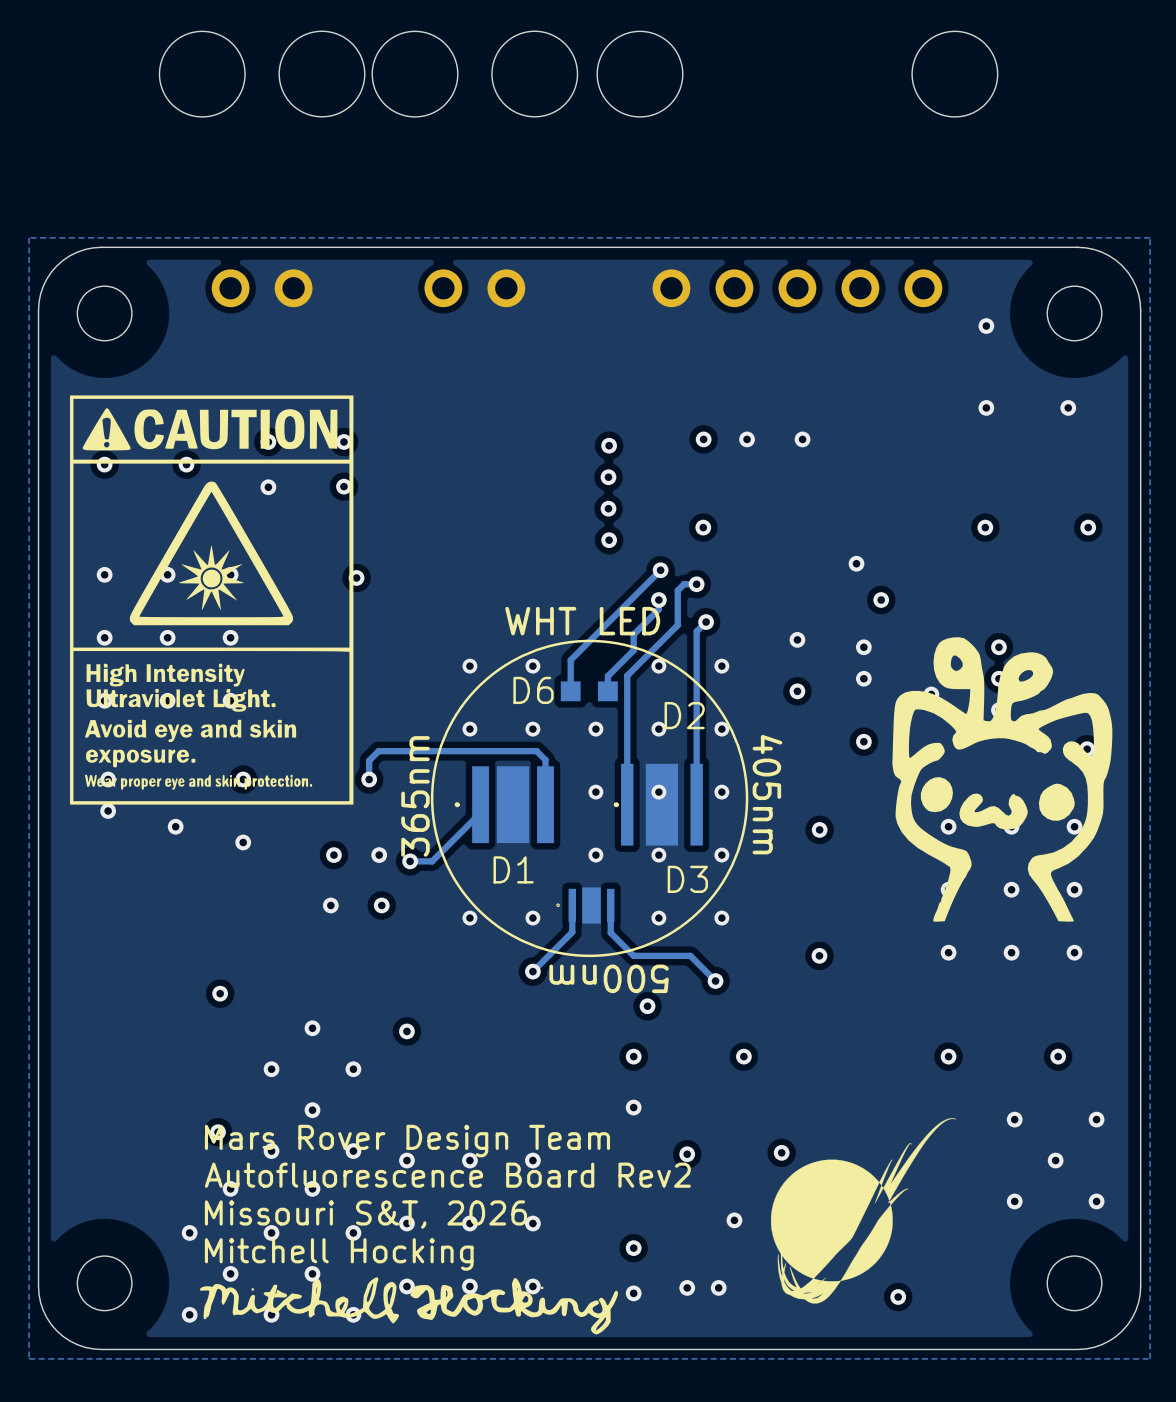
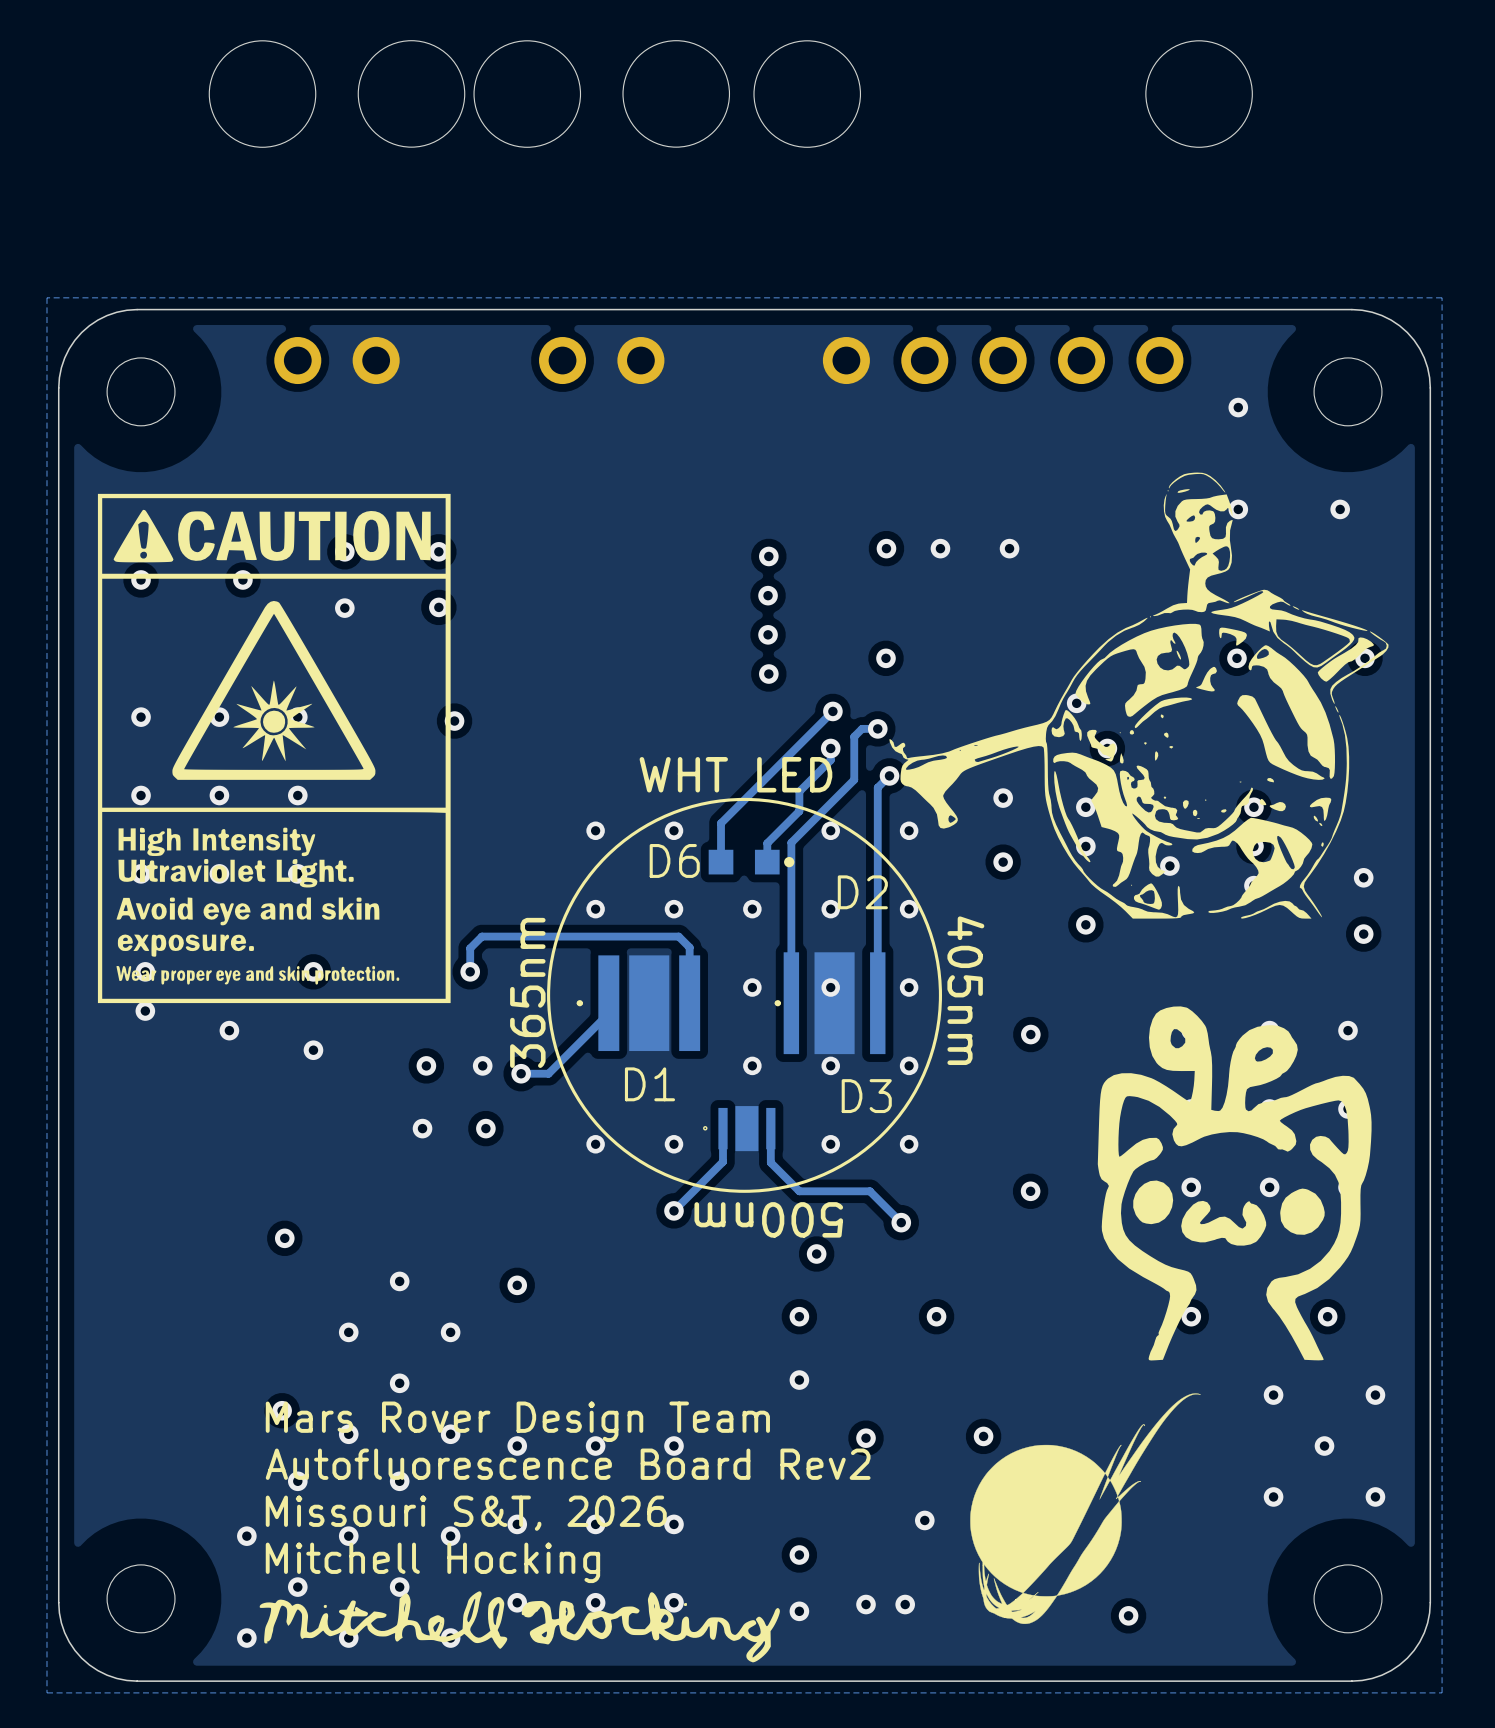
drawing: none -> [889, 472, 1389, 919]
D6 footprint: [560, 681, 618, 702] -> [708, 849, 795, 875]
drawing position: (1002, 779) -> (1234, 1183)

